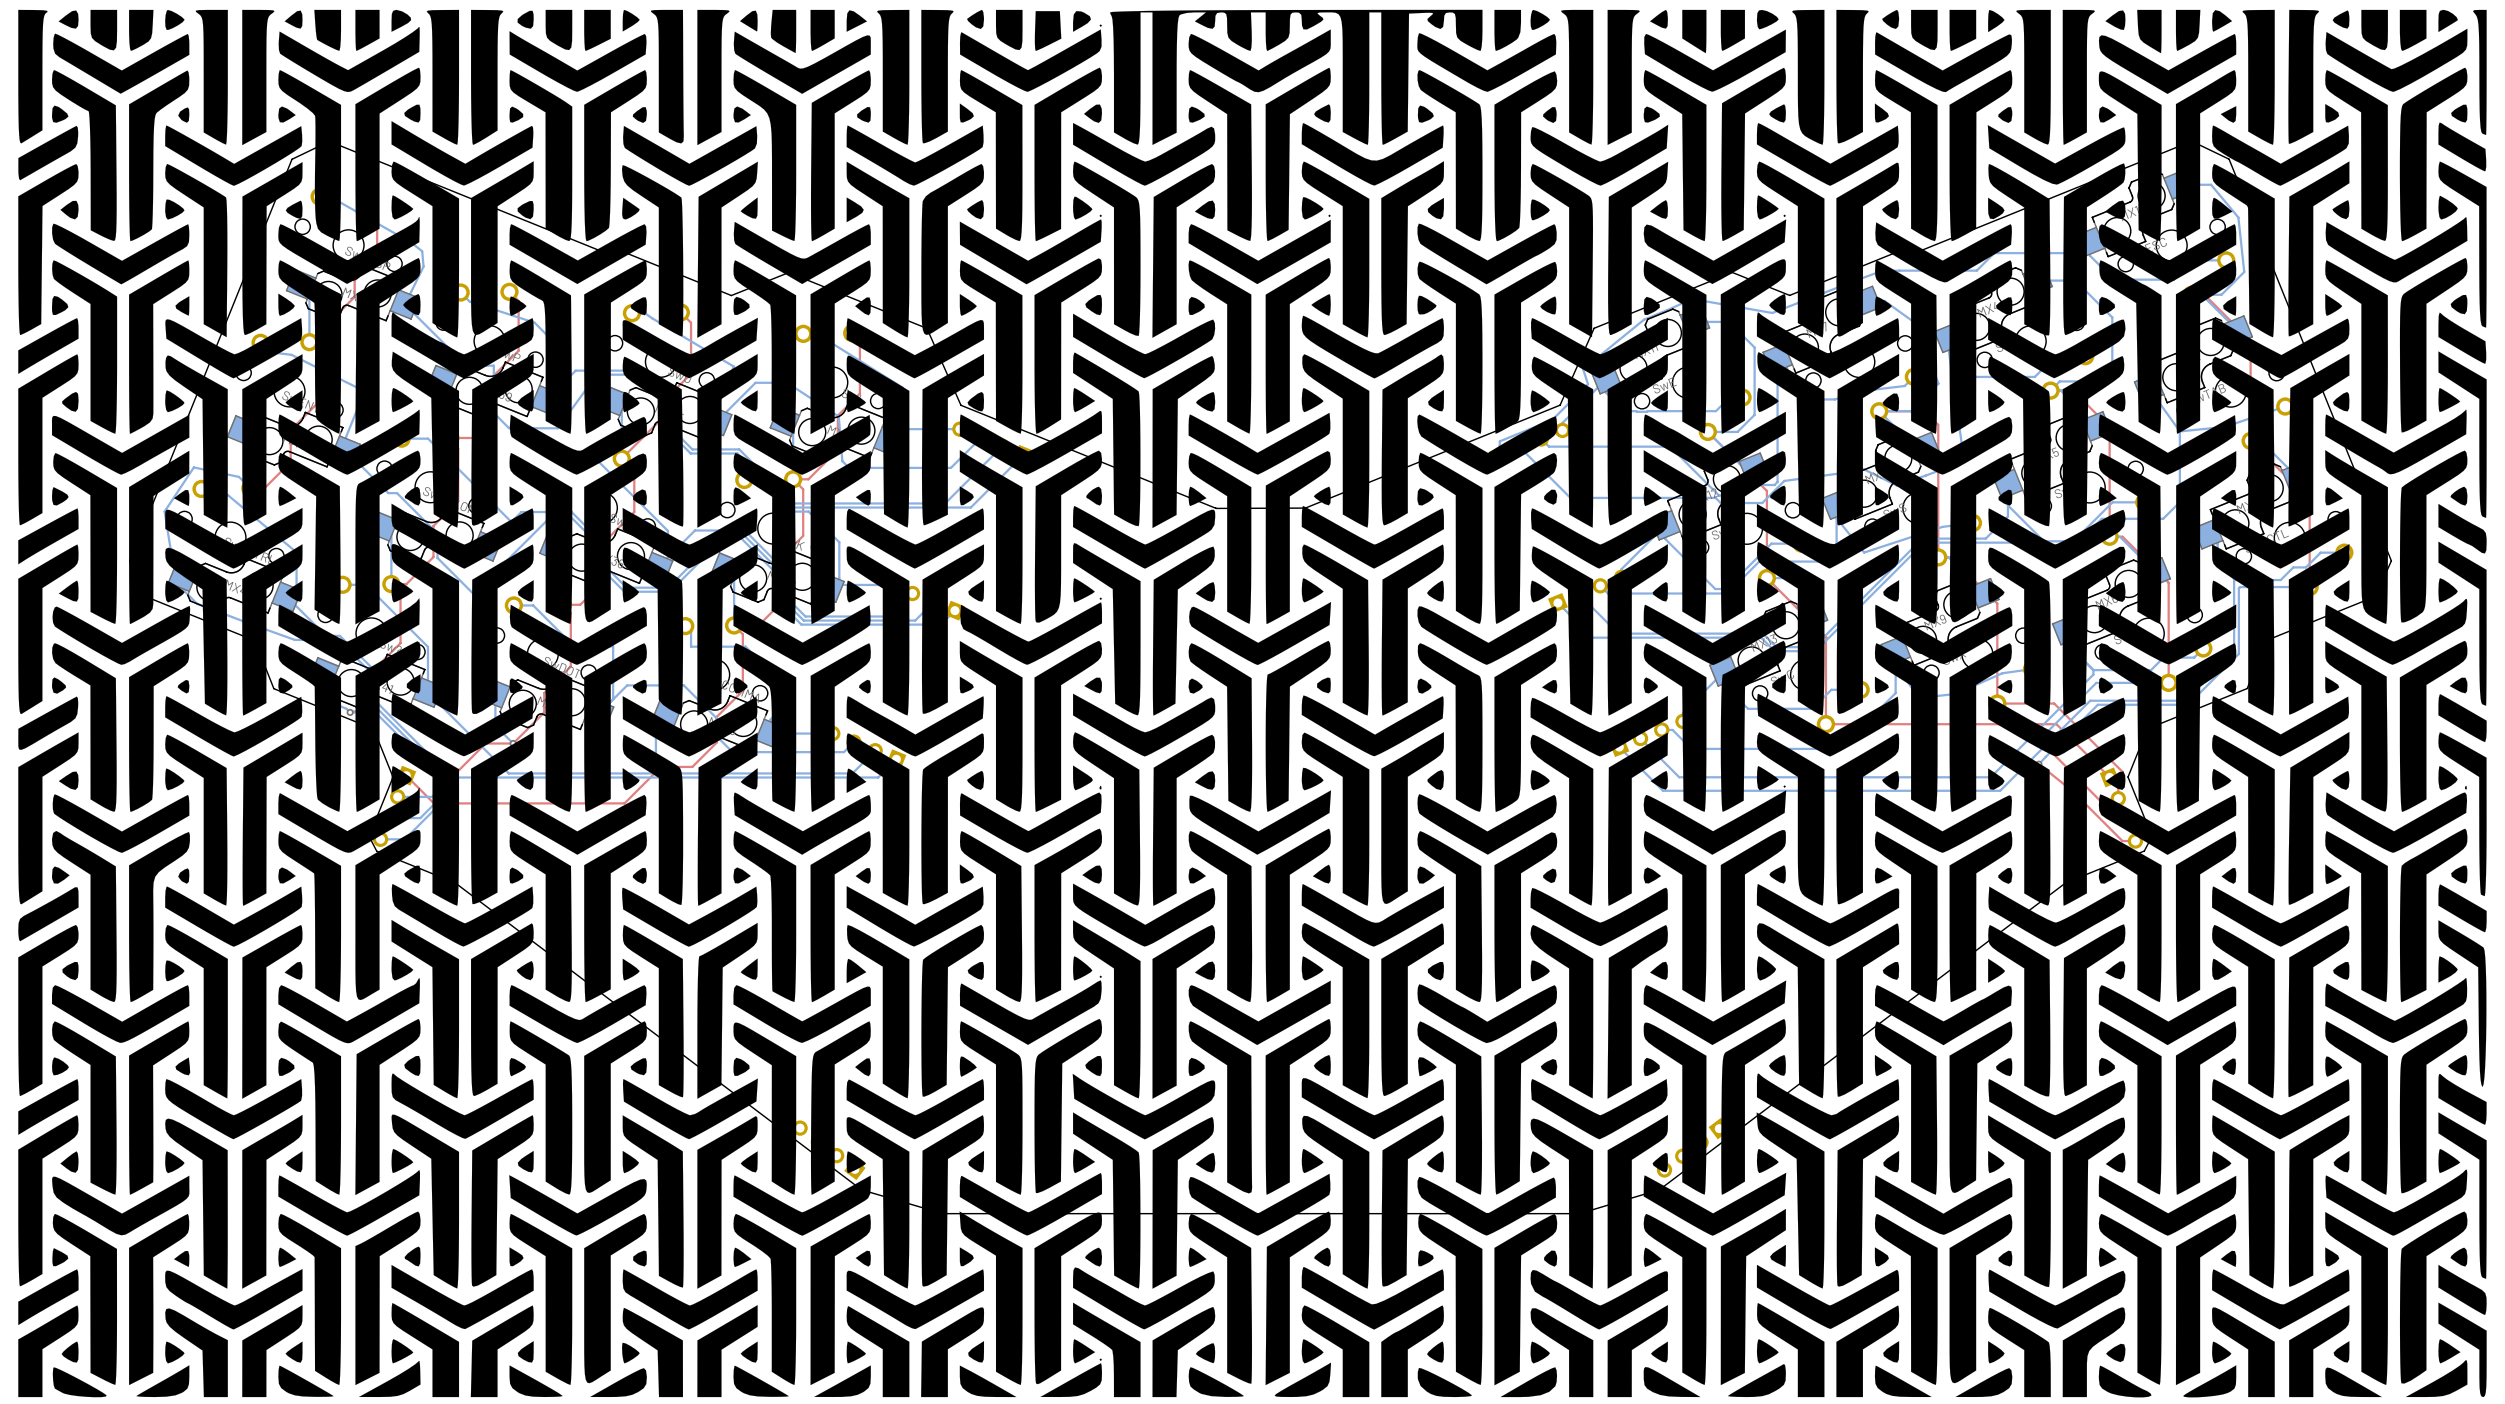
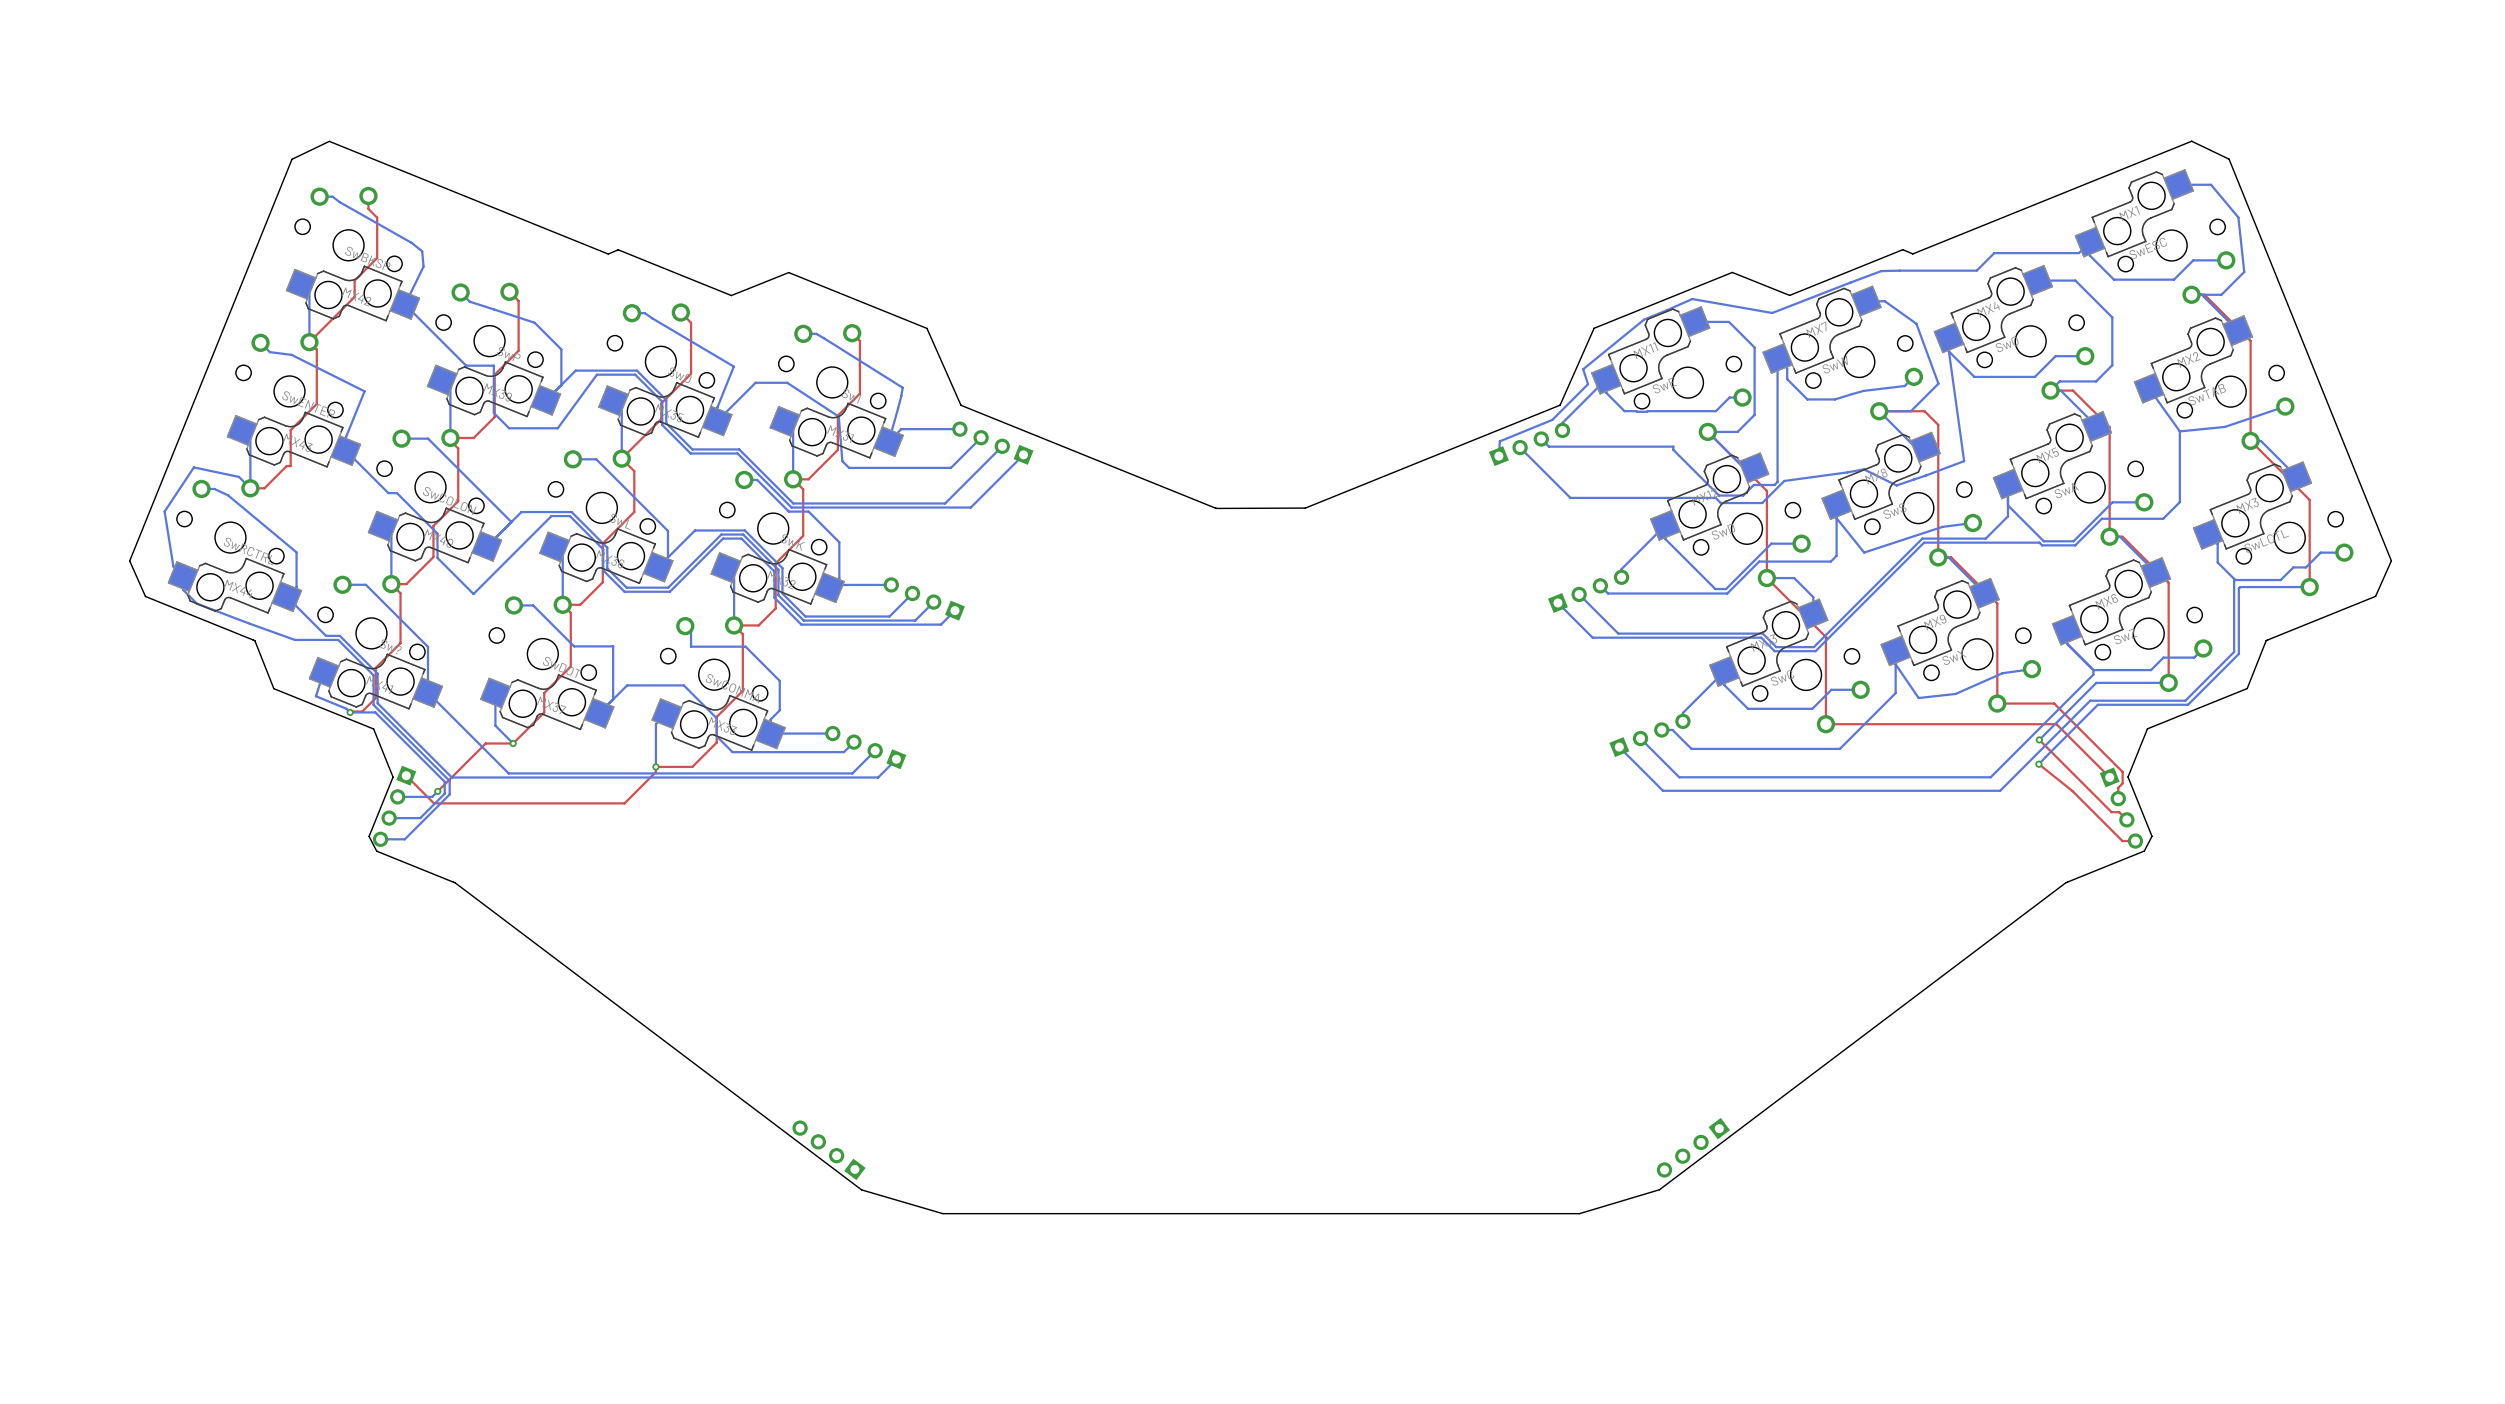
drawing: [18, 9, 2487, 1398] -> none

